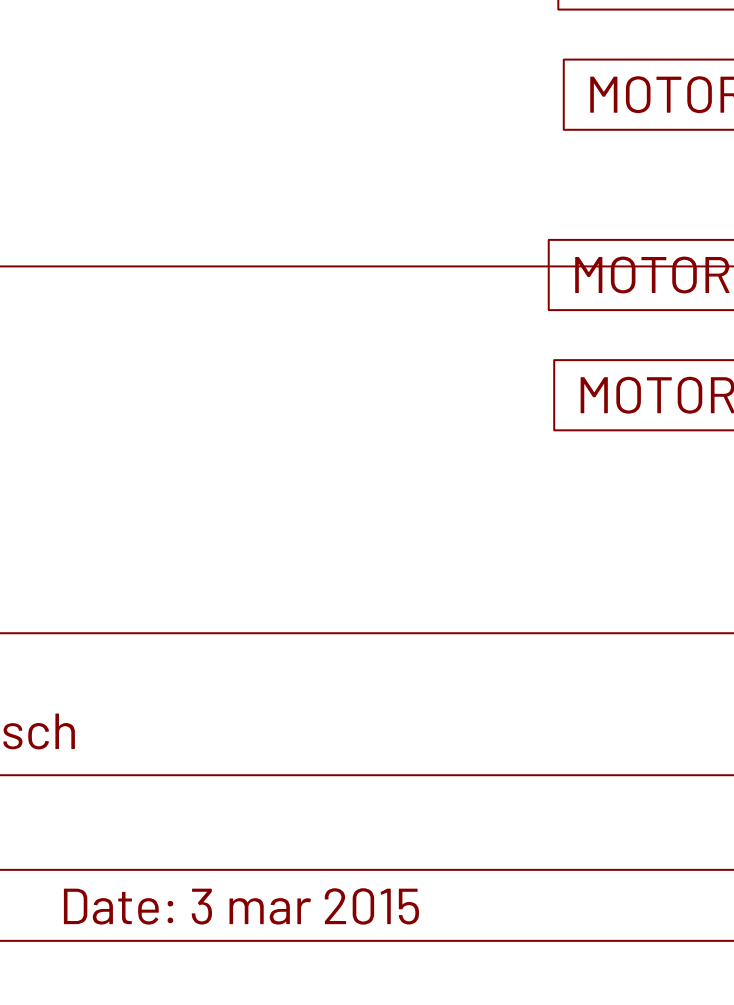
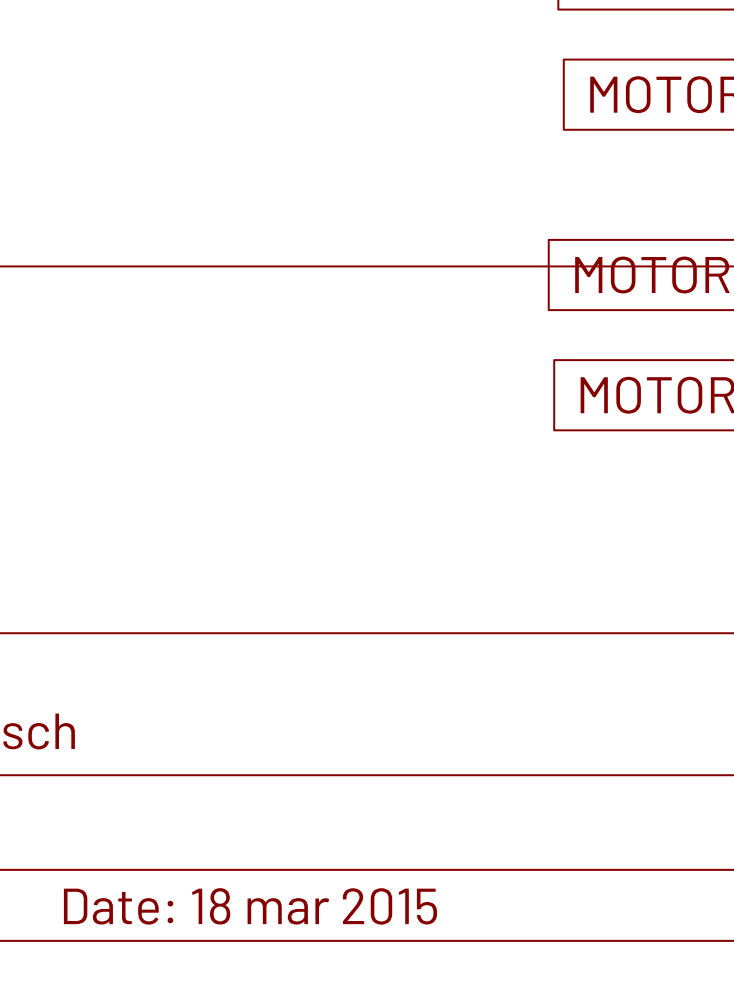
title block: Date: 3 mar 2015 (241, 906) -> Date: 18 mar 2015 (250, 906)

